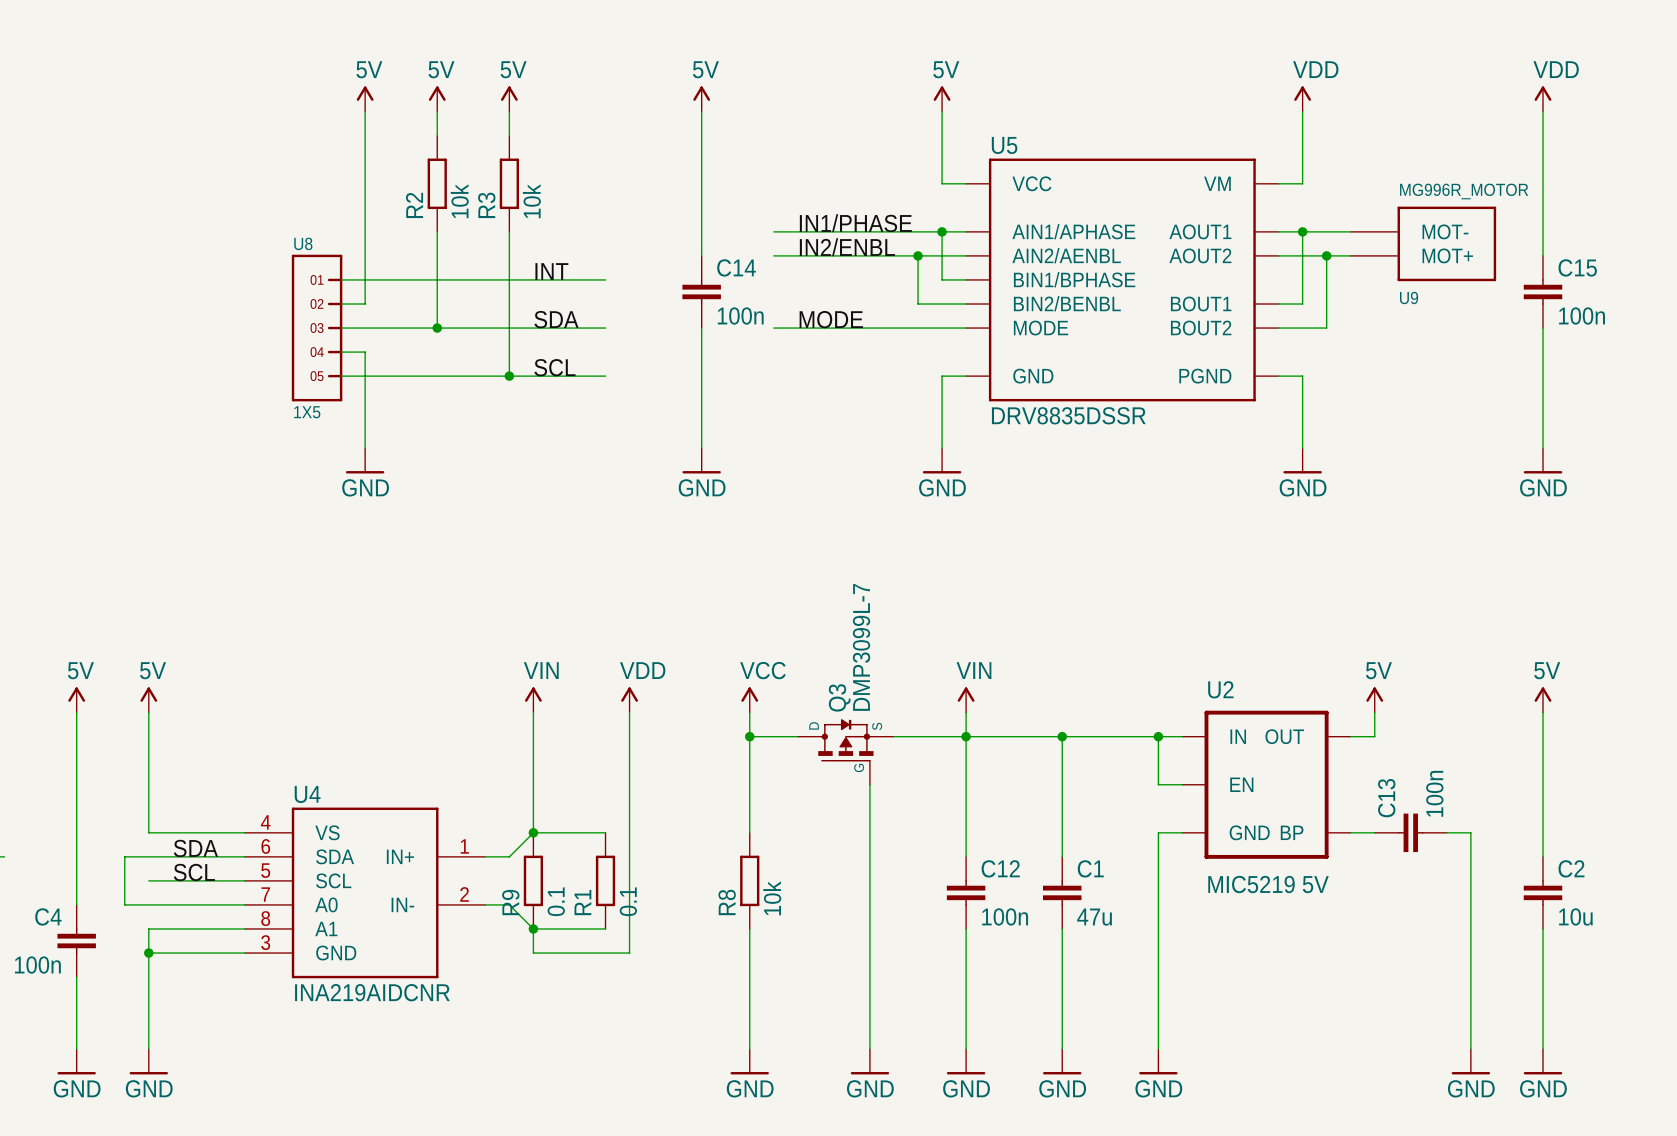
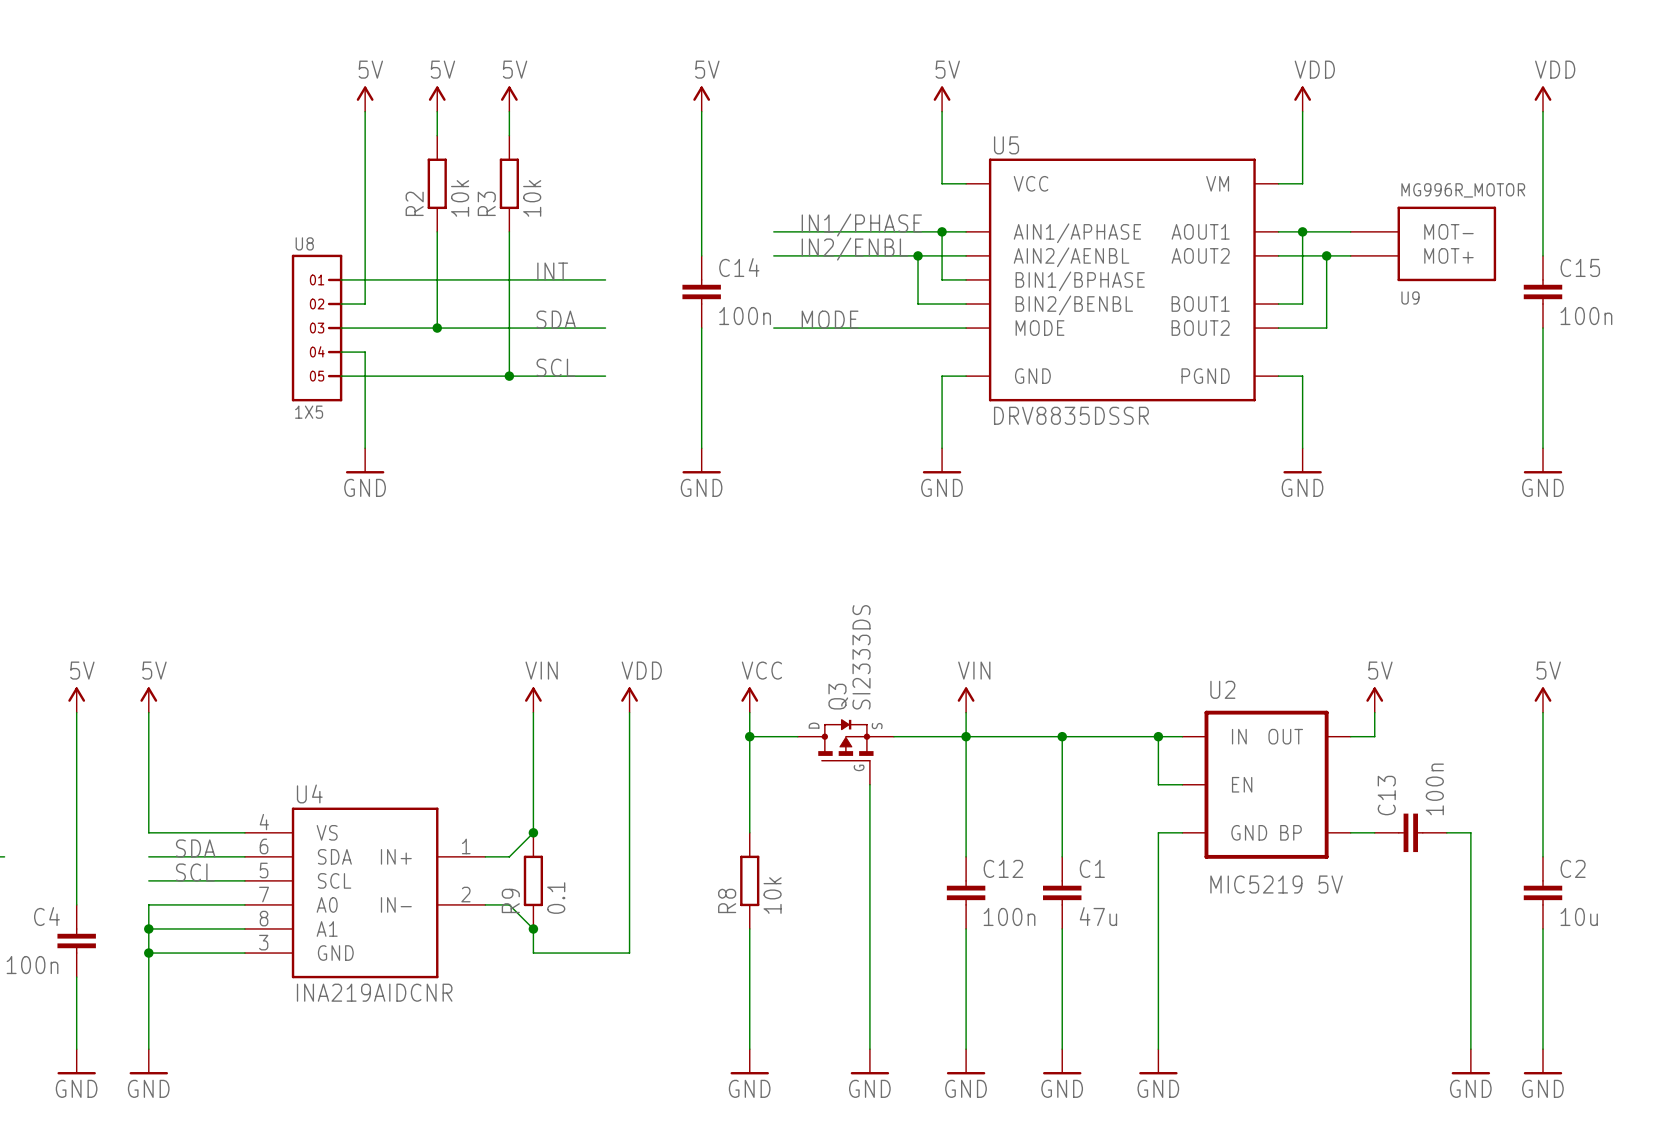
Q3 value: DMP3099L-7 (861, 647) -> SI2333DS (861, 657)
wire: (533, 832) (605, 832) -> none
wire: (148, 856) (124, 856) (124, 904) (148, 904) -> (148, 928) (148, 904)
R1: 0.1 (605, 880) -> none
junction: none -> (148, 928)
wire: (533, 928) (605, 928) -> none

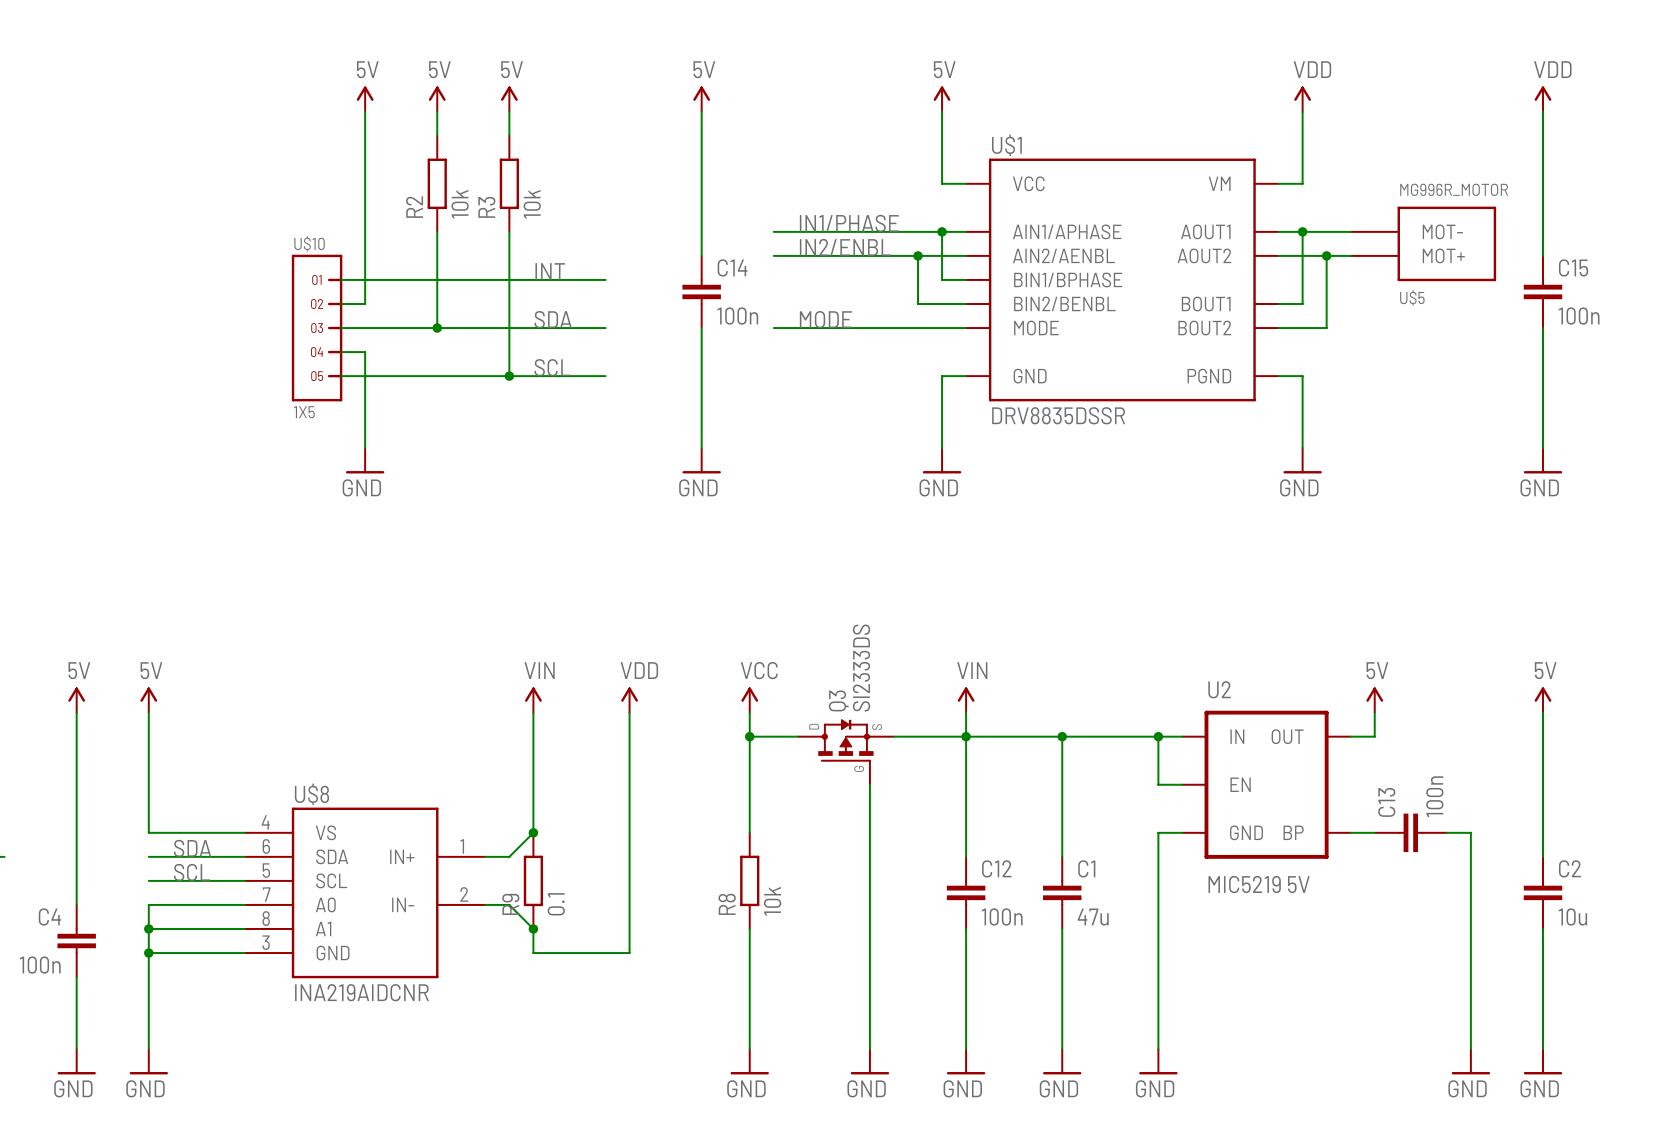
U5 name: U5 (1006, 145) -> U$1 (1006, 145)
U8 name: U8 (304, 243) -> U$10 (309, 243)
U9 name: U9 (1410, 297) -> U$5 (1412, 297)
U4 name: U4 (309, 793) -> U$8 (311, 794)

